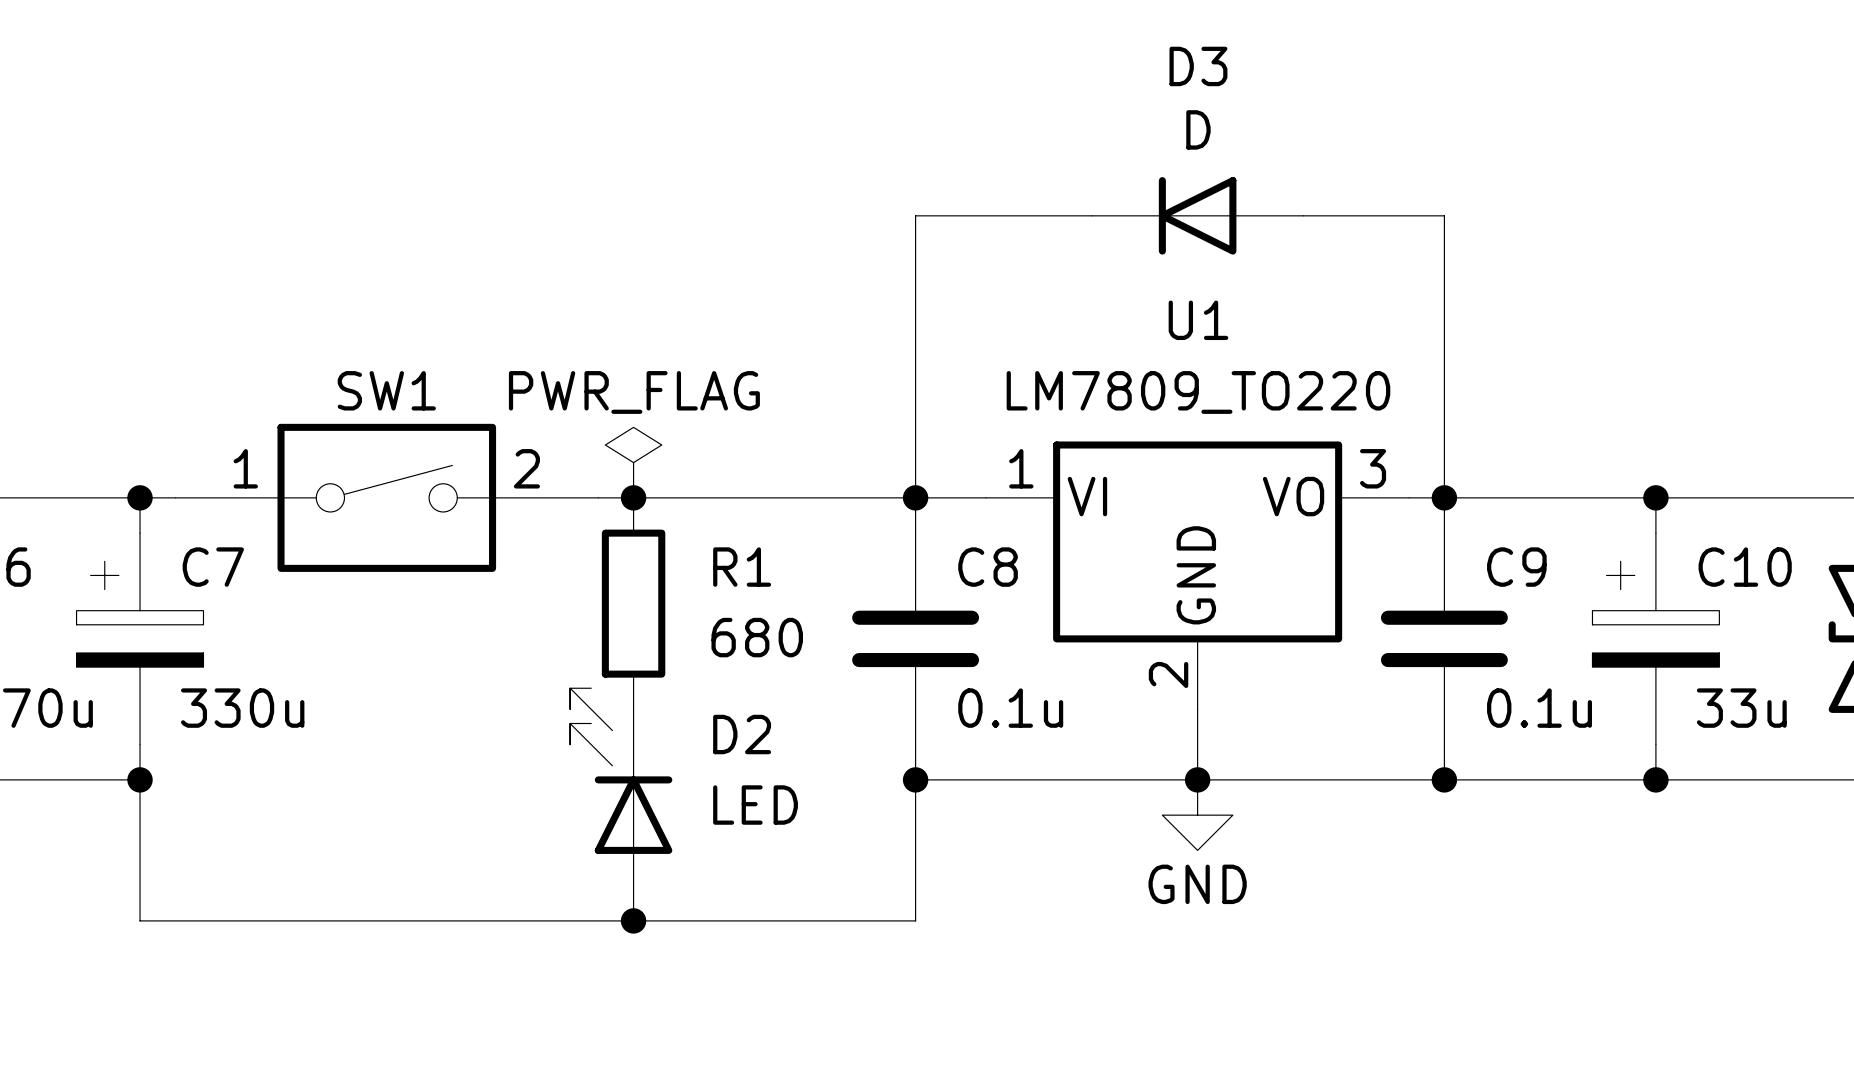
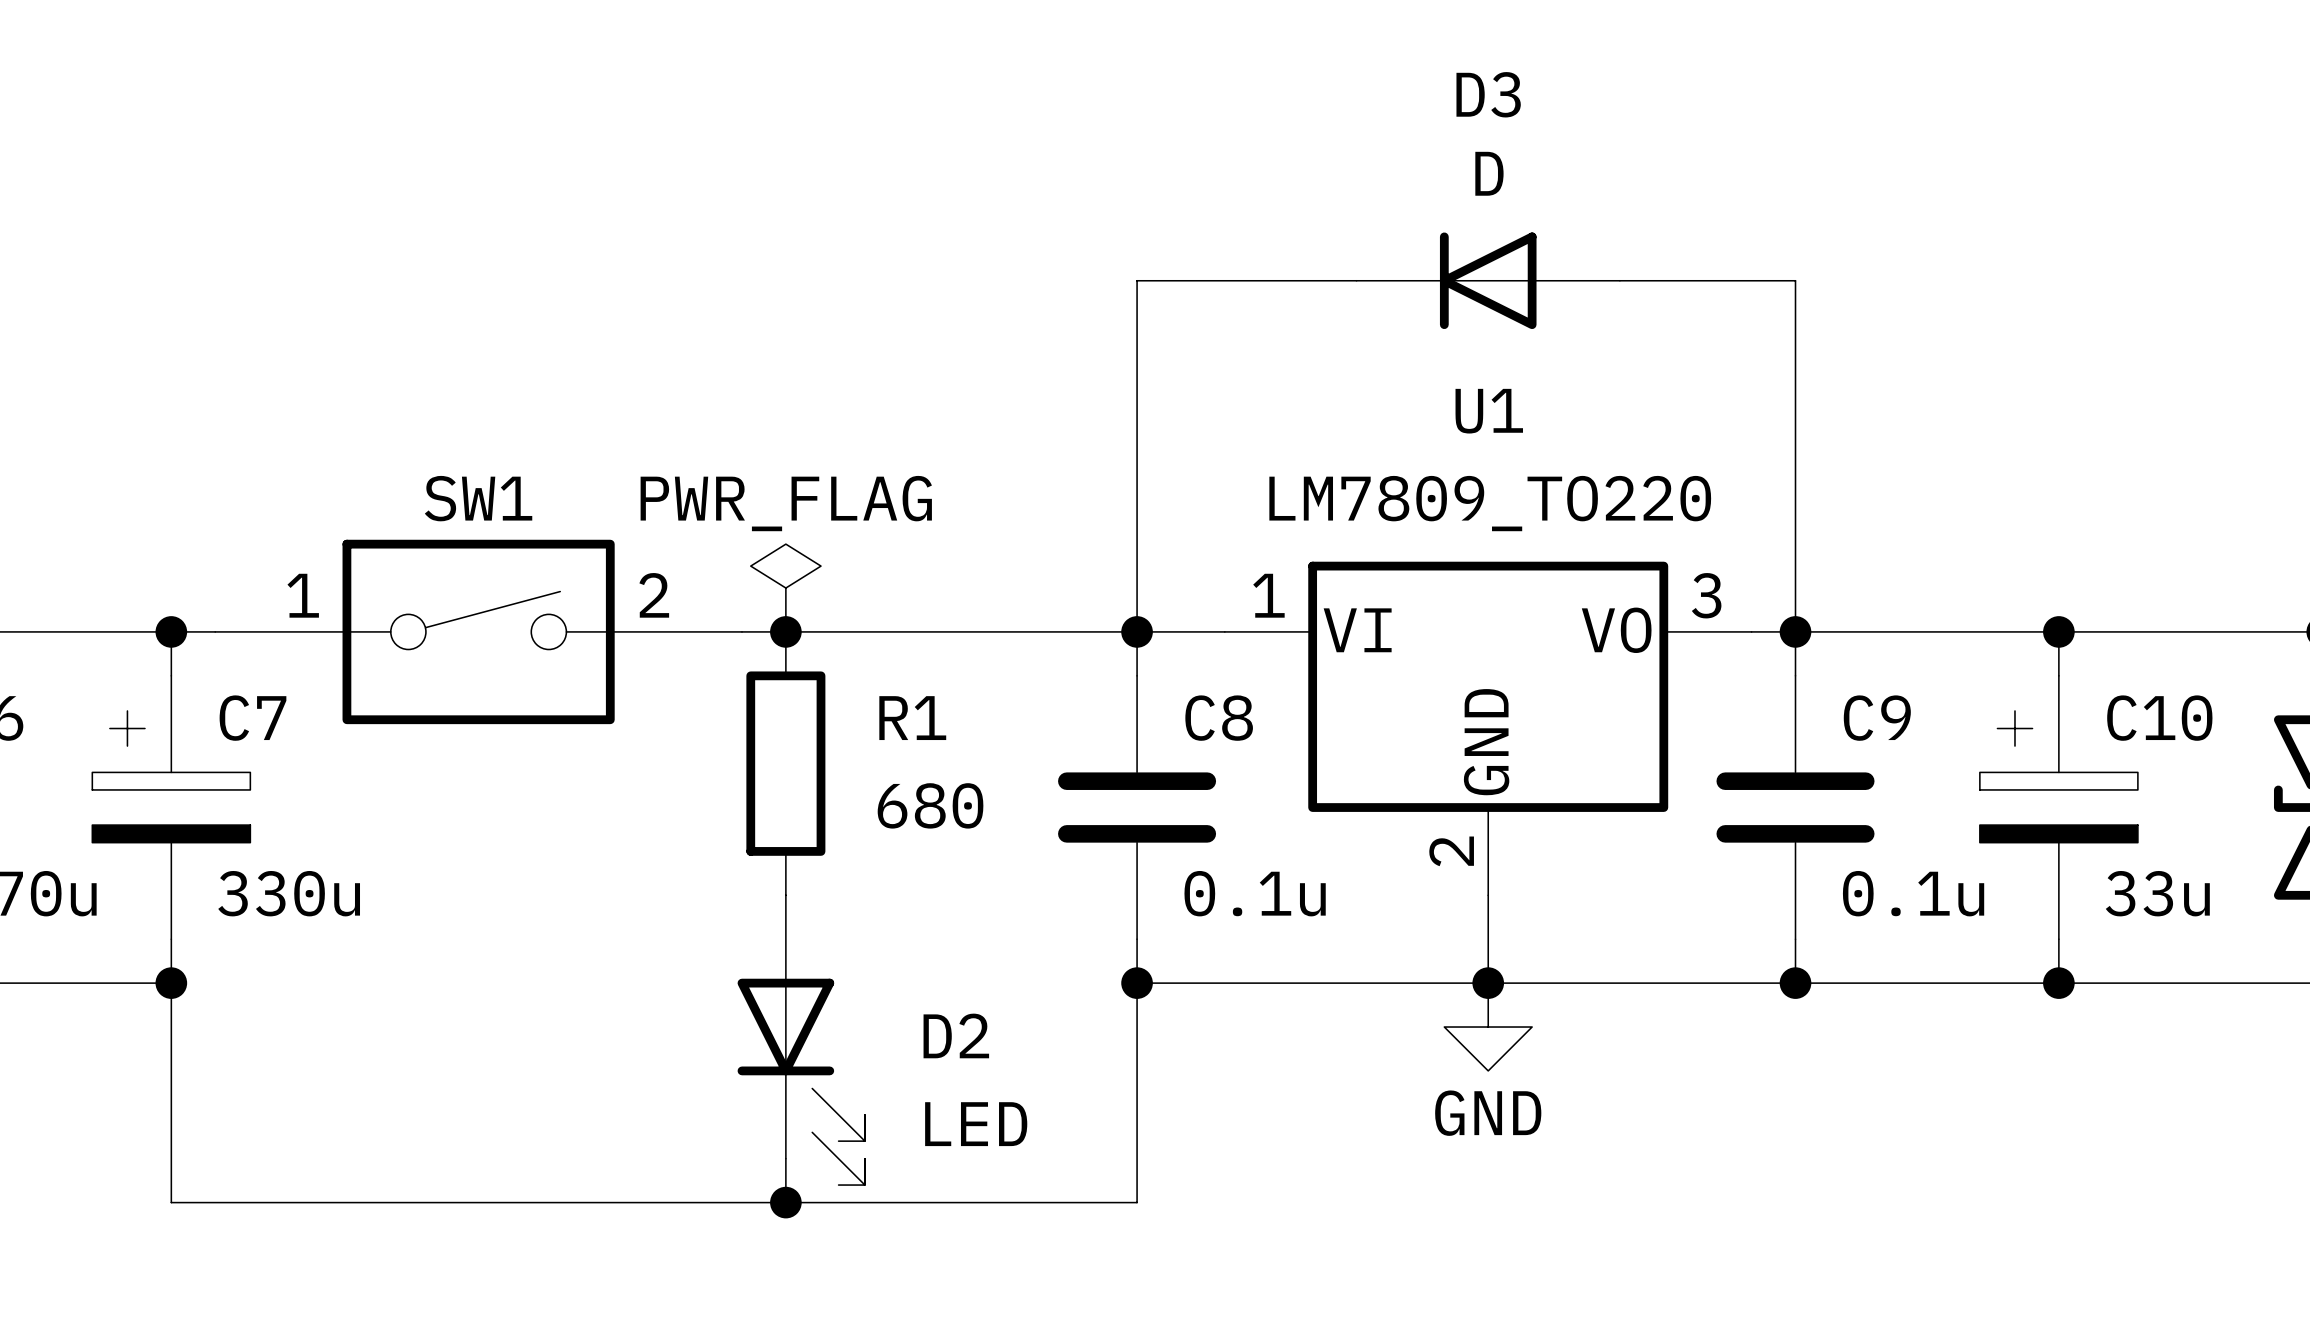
D2 name position: D2 (742, 734) -> D2 (956, 1035)
D2 rotation: 0° (621, 771) -> 180° (801, 1081)
D2 value position: LED (755, 805) -> LED (976, 1124)
wire: (140, 920) (915, 920) -> (171, 1158) (171, 1202) (1137, 1202) (1137, 1158)
wire: none -> (785, 1158) (785, 1202)
junction position: (633, 920) -> (785, 1202)

